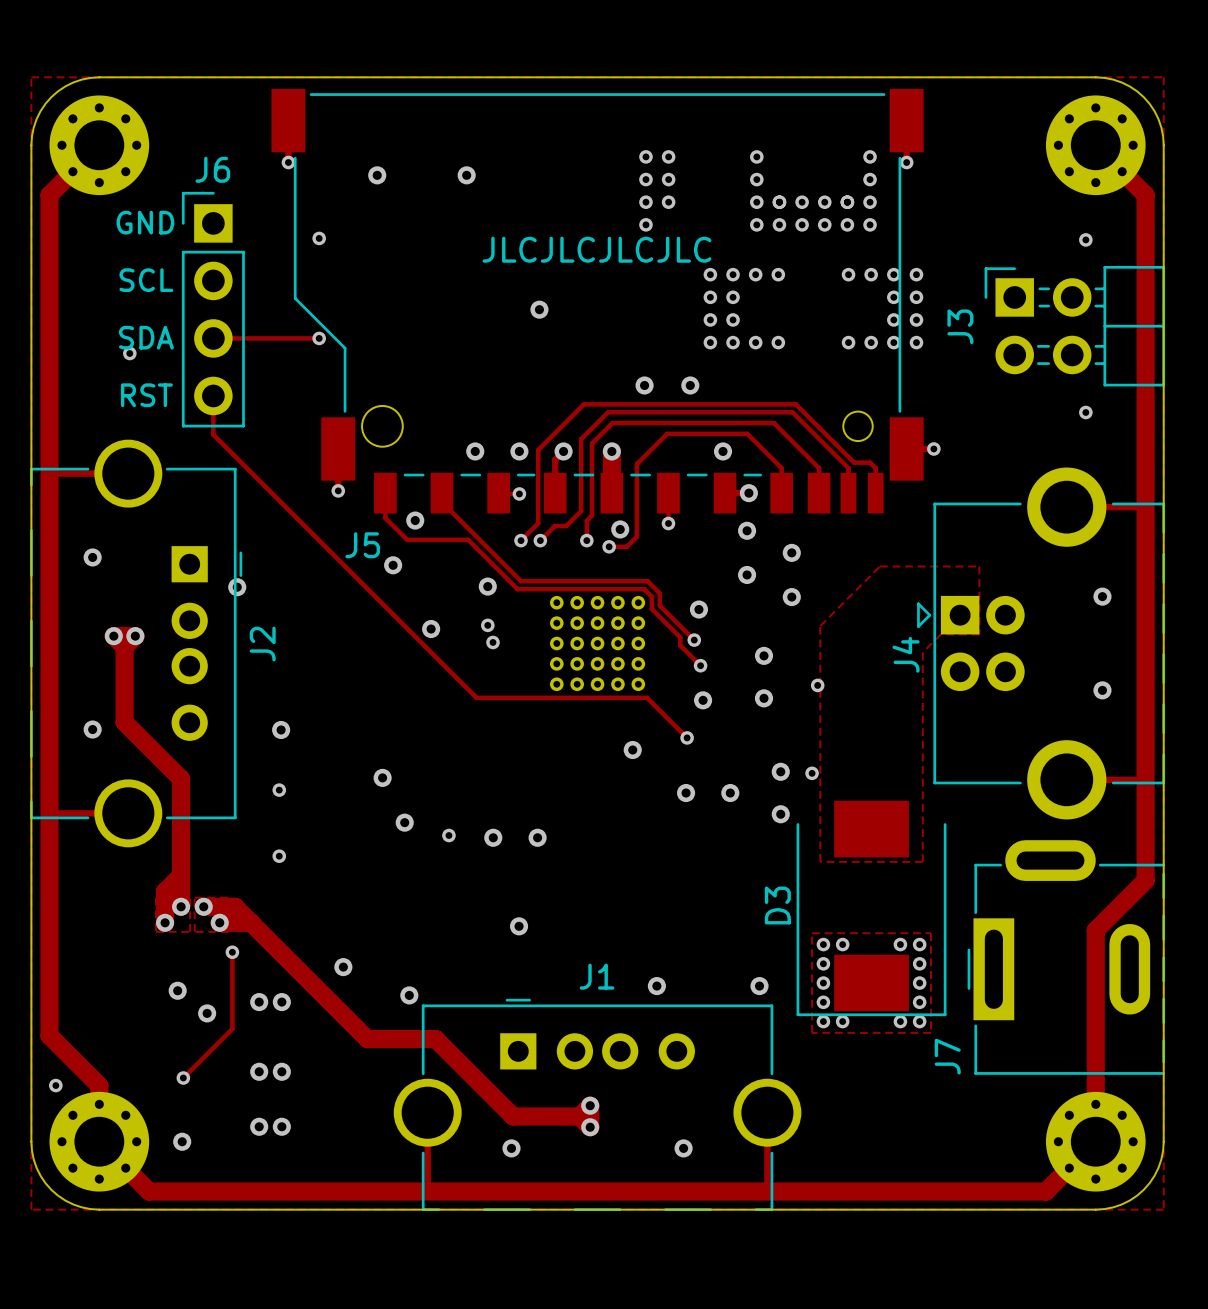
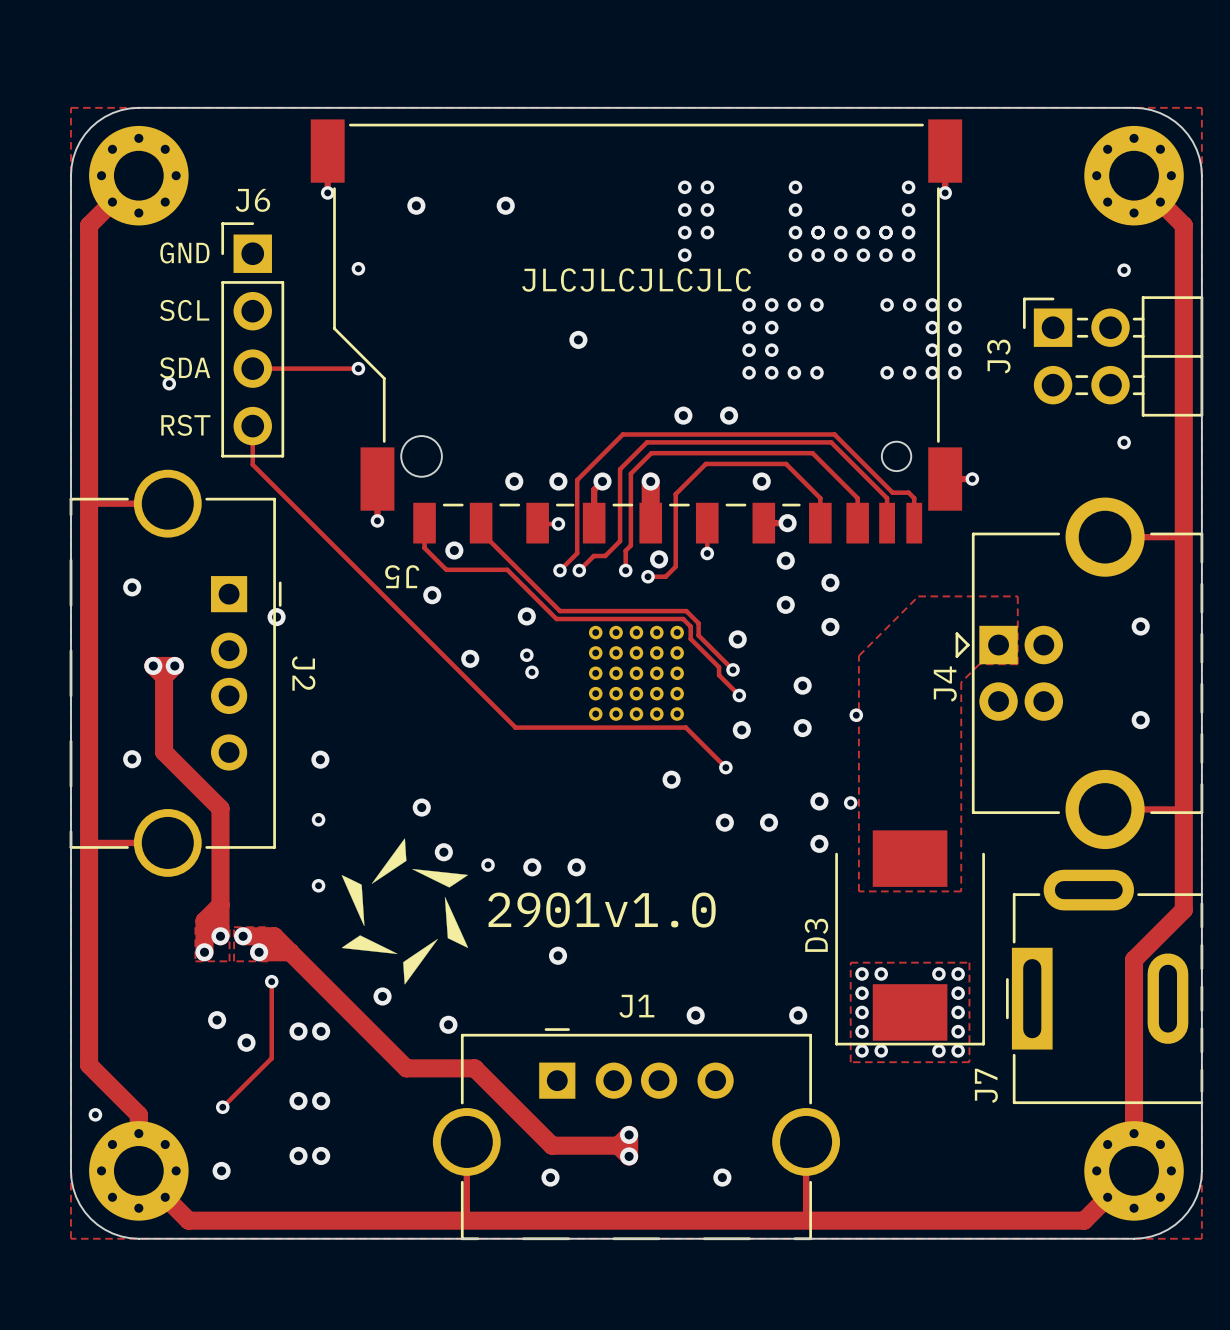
J5 name rotation: 0° (362, 545) -> 180° (402, 576)
J2 name rotation: 0° (262, 644) -> 180° (303, 673)
drawing: none -> [341, 838, 469, 985]

